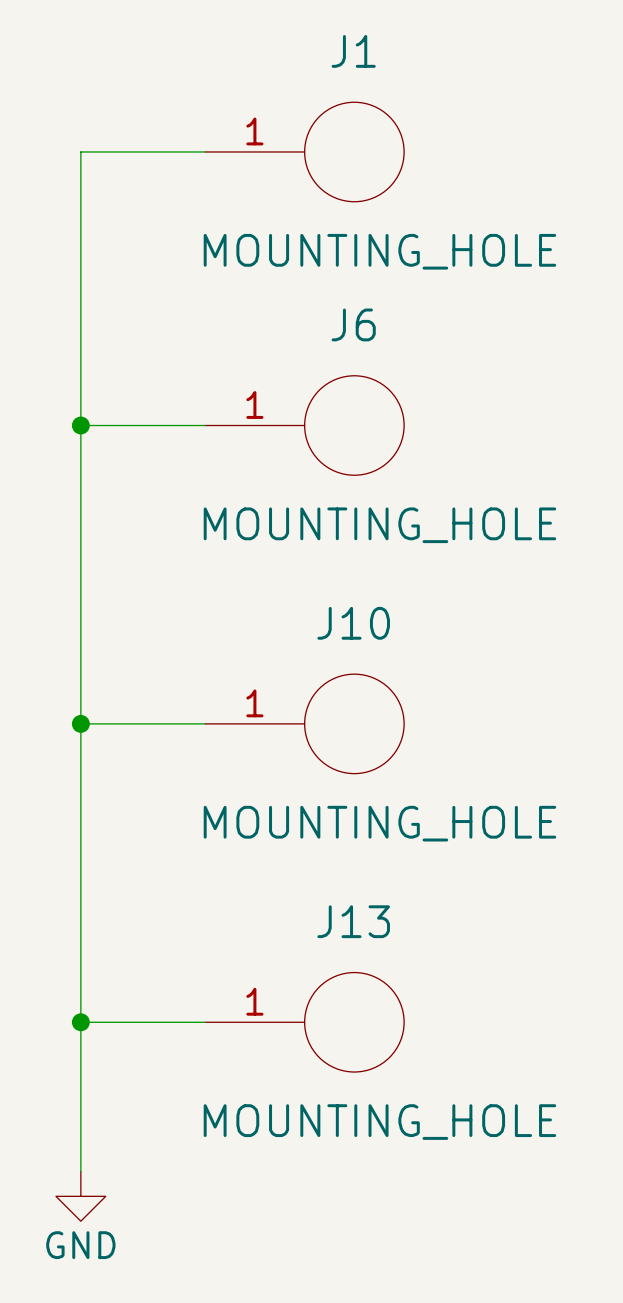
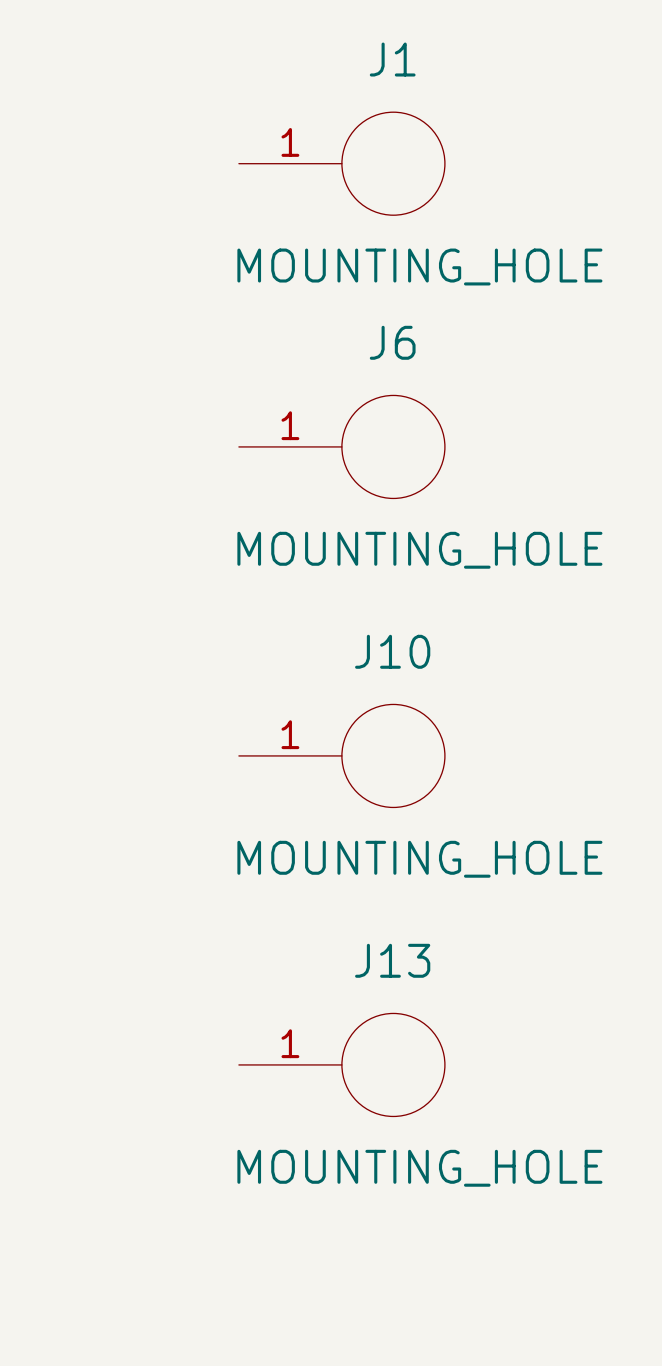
wire: (205, 151) (80, 151) (80, 1171) -> none
wire: (80, 425) (205, 425) -> none
junction: (80, 425) -> none
wire: (80, 723) (205, 723) -> none
junction: (80, 723) -> none
wire: (80, 1022) (205, 1022) -> none
junction: (80, 1022) -> none
power symbol: GND (80, 1196) -> none

